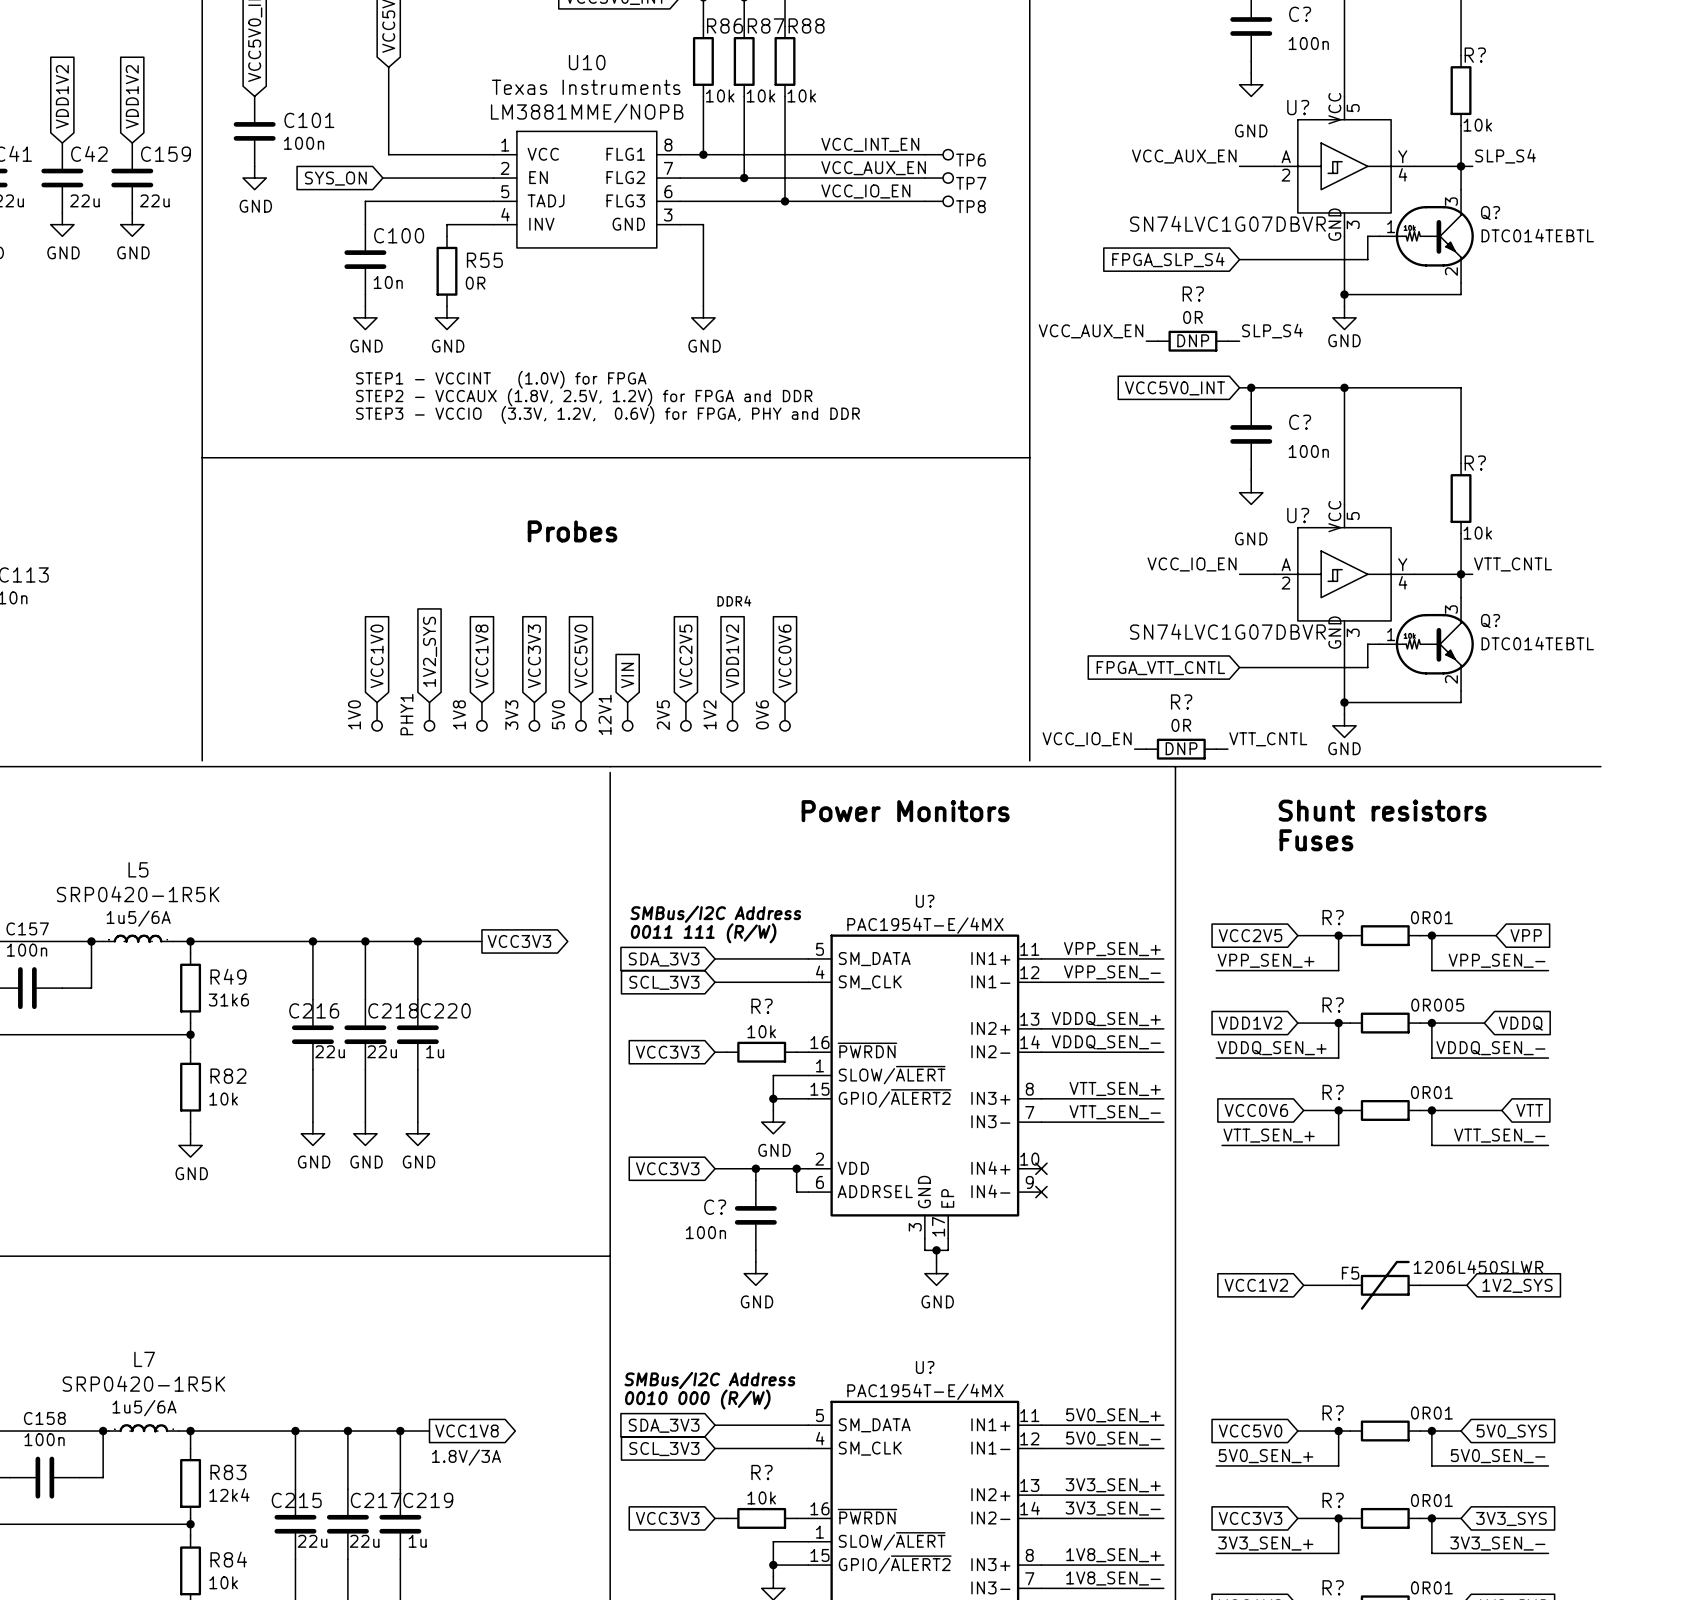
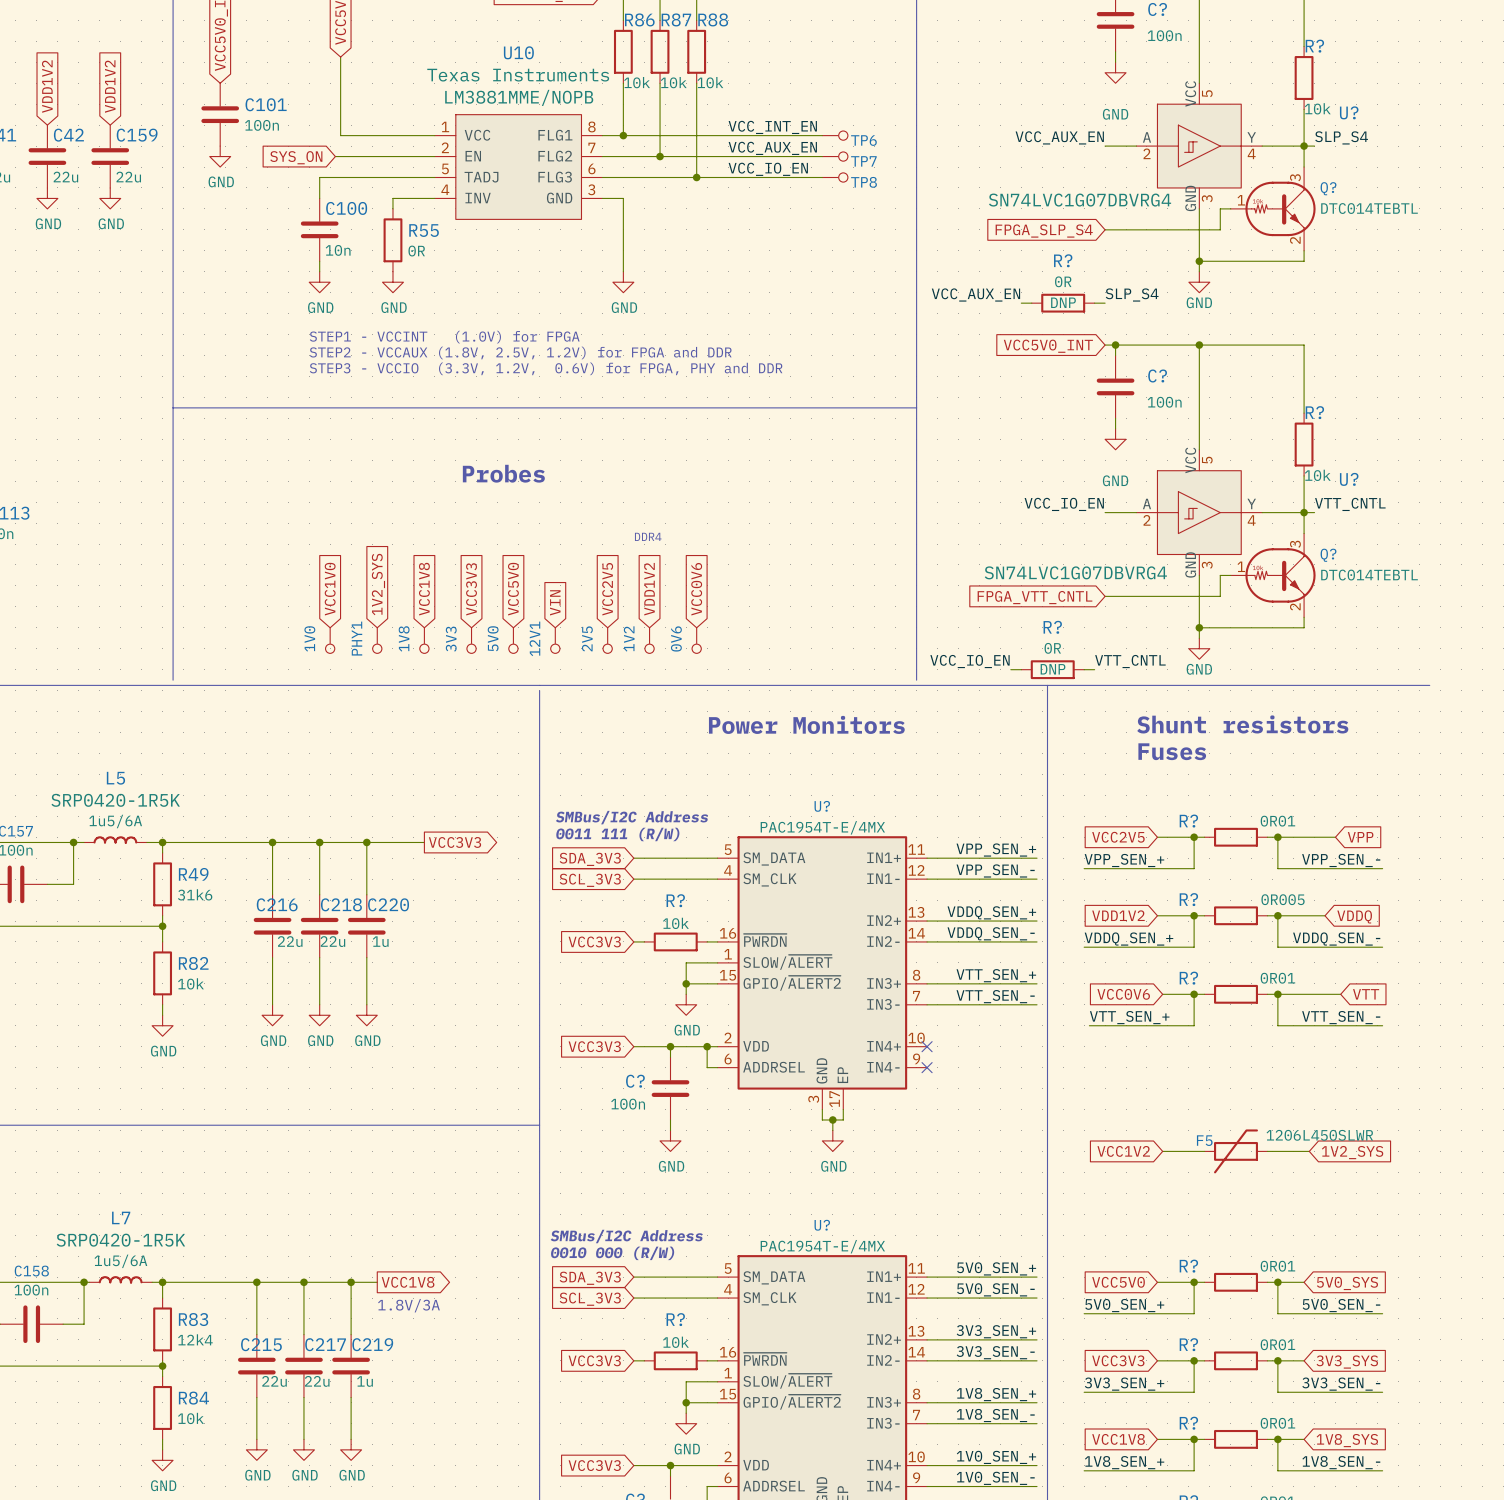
U? name position: U? (1298, 107) -> U? (1349, 112)
U? value: SN74LVC1G07DBVR (1227, 223) -> SN74LVC1G07DBVRG4 (1080, 200)
U? name position: U? (1298, 515) -> U? (1349, 479)
U? value: SN74LVC1G07DBVR (1227, 631) -> SN74LVC1G07DBVRG4 (1075, 572)

